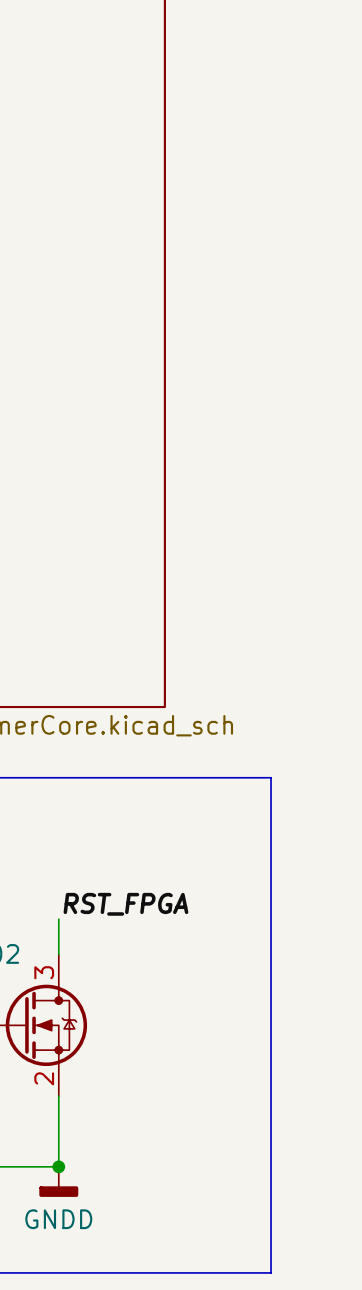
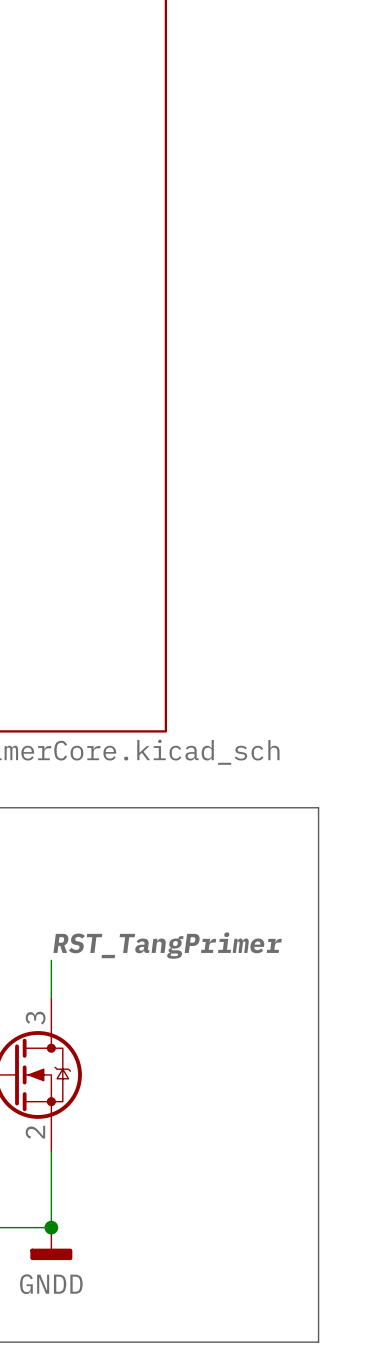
line: (271, 777) (271, 1272) -> (280, 807) (318, 807) (318, 1342) (280, 1342)
label: RST_FPGA (125, 904) -> RST_TangPrimer (167, 945)

